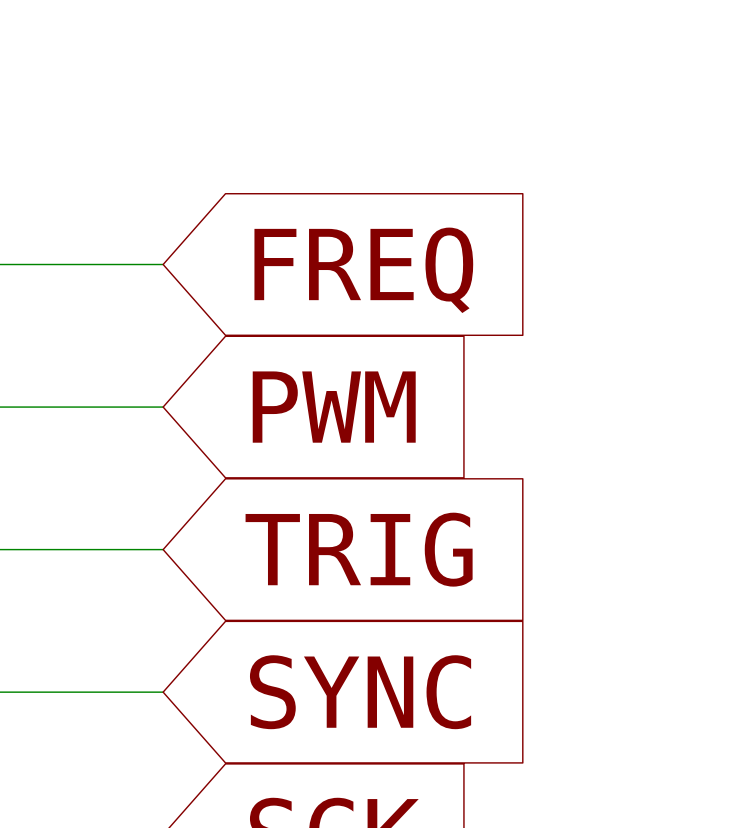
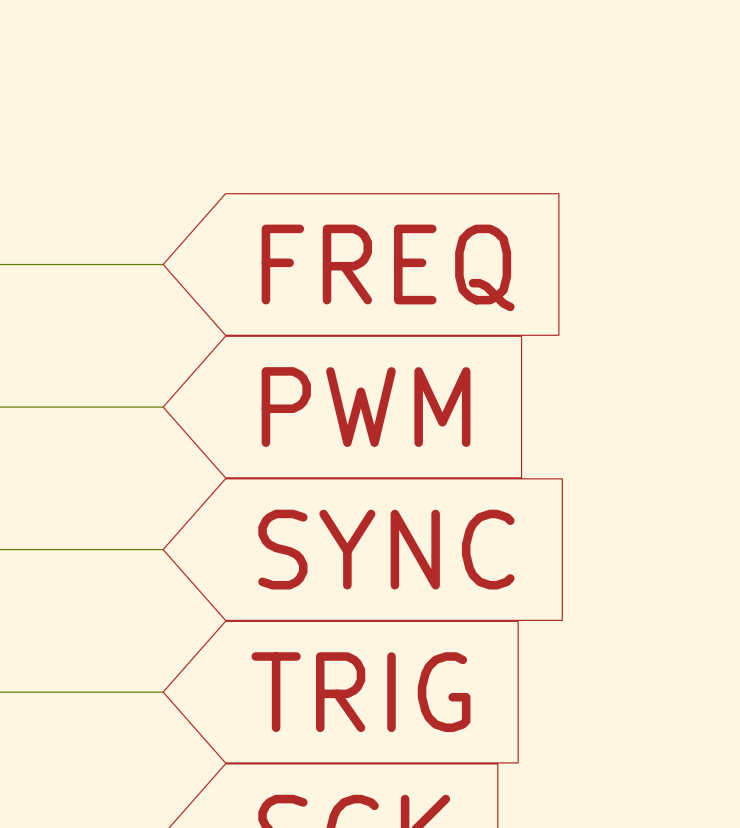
global label: TRIG (359, 549) -> SYNC (386, 549)
global label: SYNC (360, 692) -> TRIG (360, 692)

